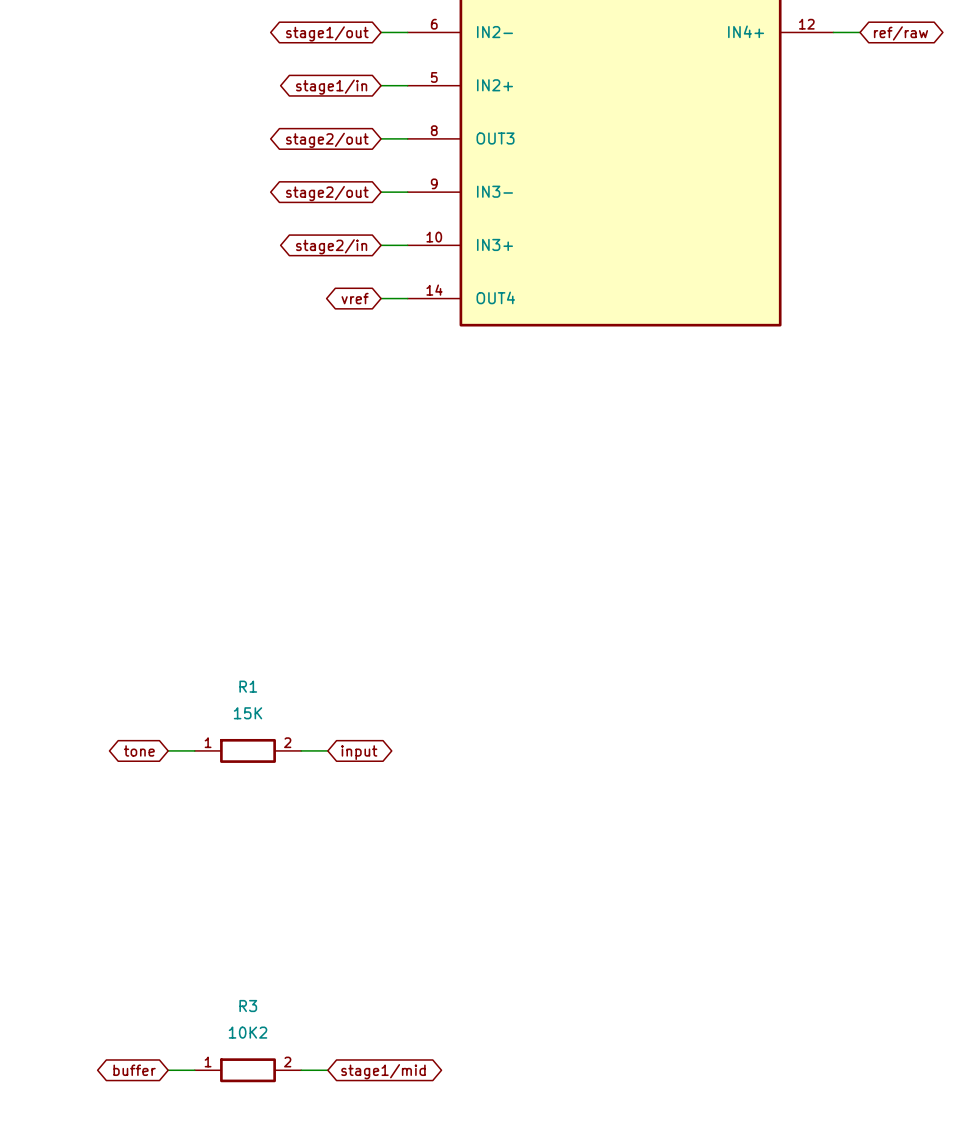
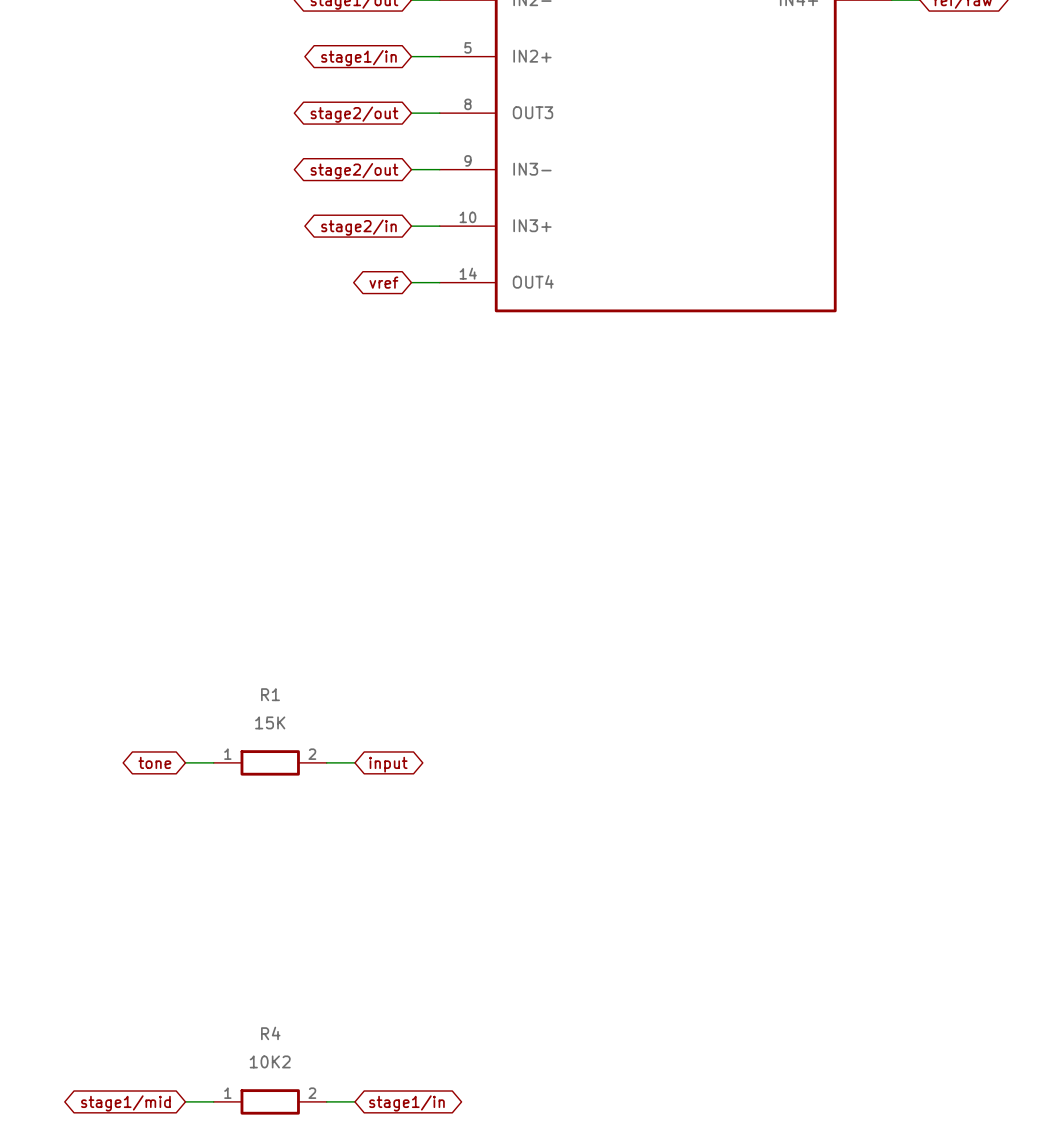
R3 name: R3 (248, 1006) -> R4 (270, 1033)
global label: buffer (134, 1070) -> stage1/mid (125, 1103)
global label: stage1/mid (383, 1071) -> stage1/in (406, 1103)

